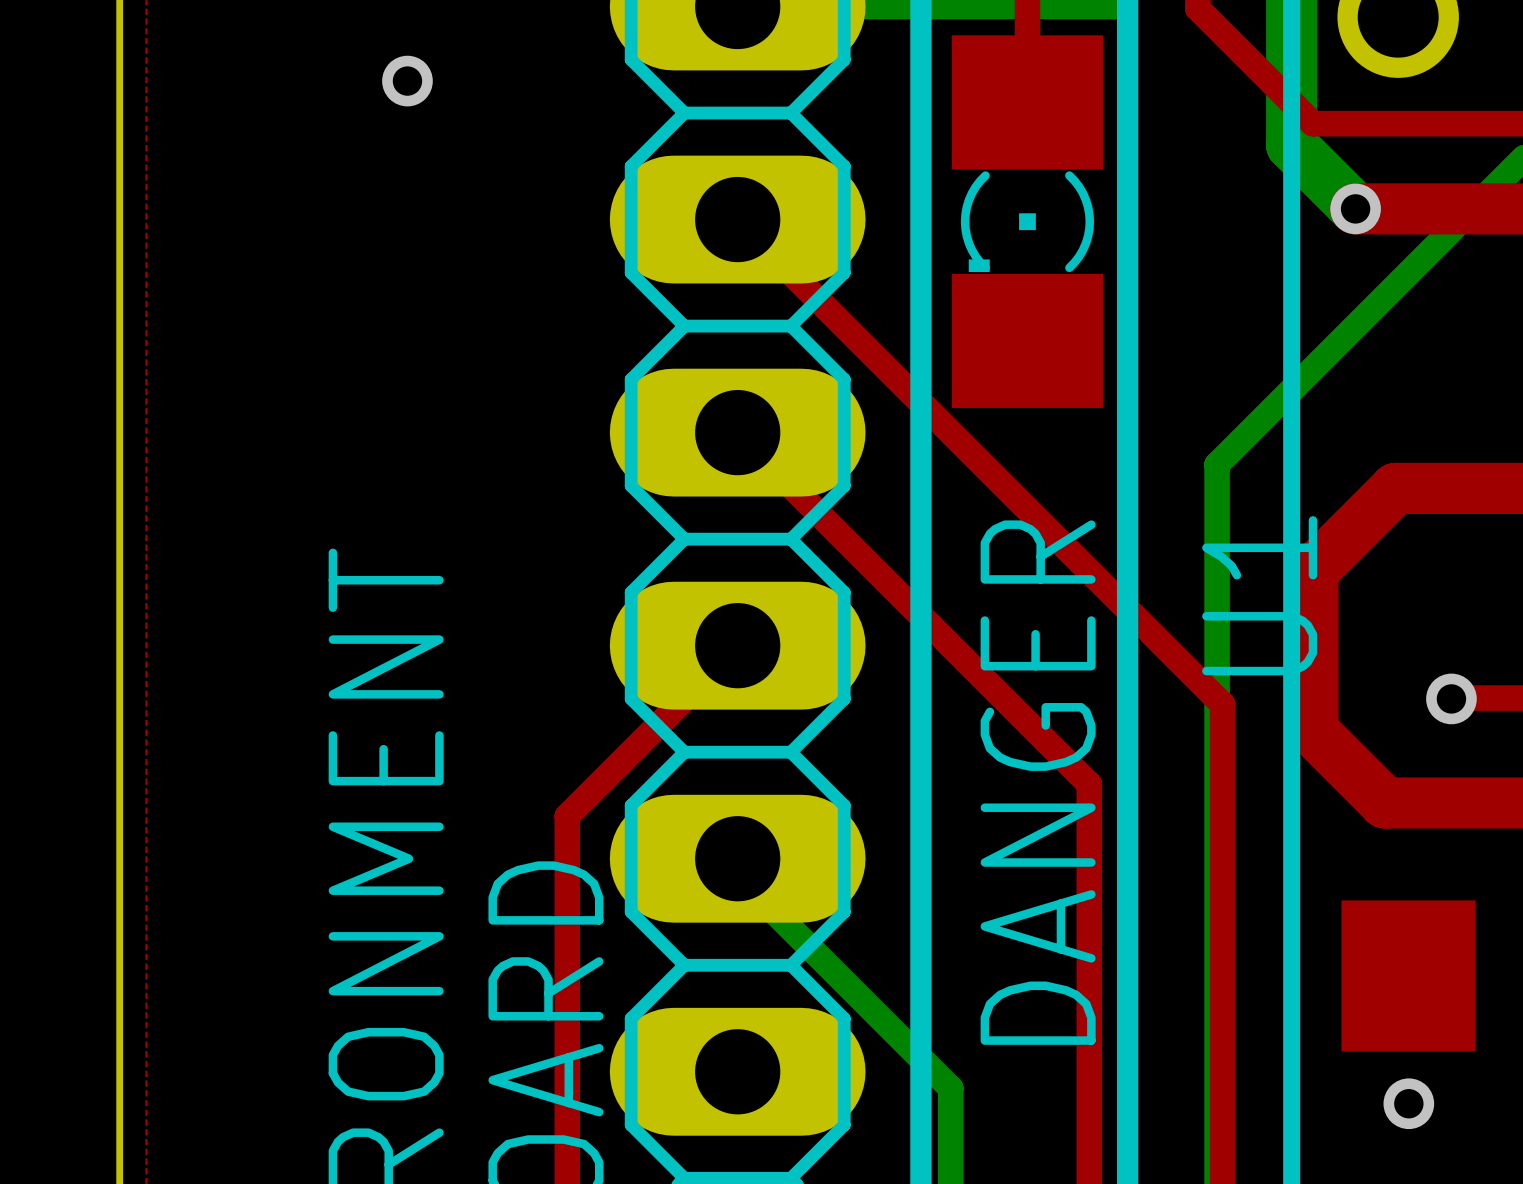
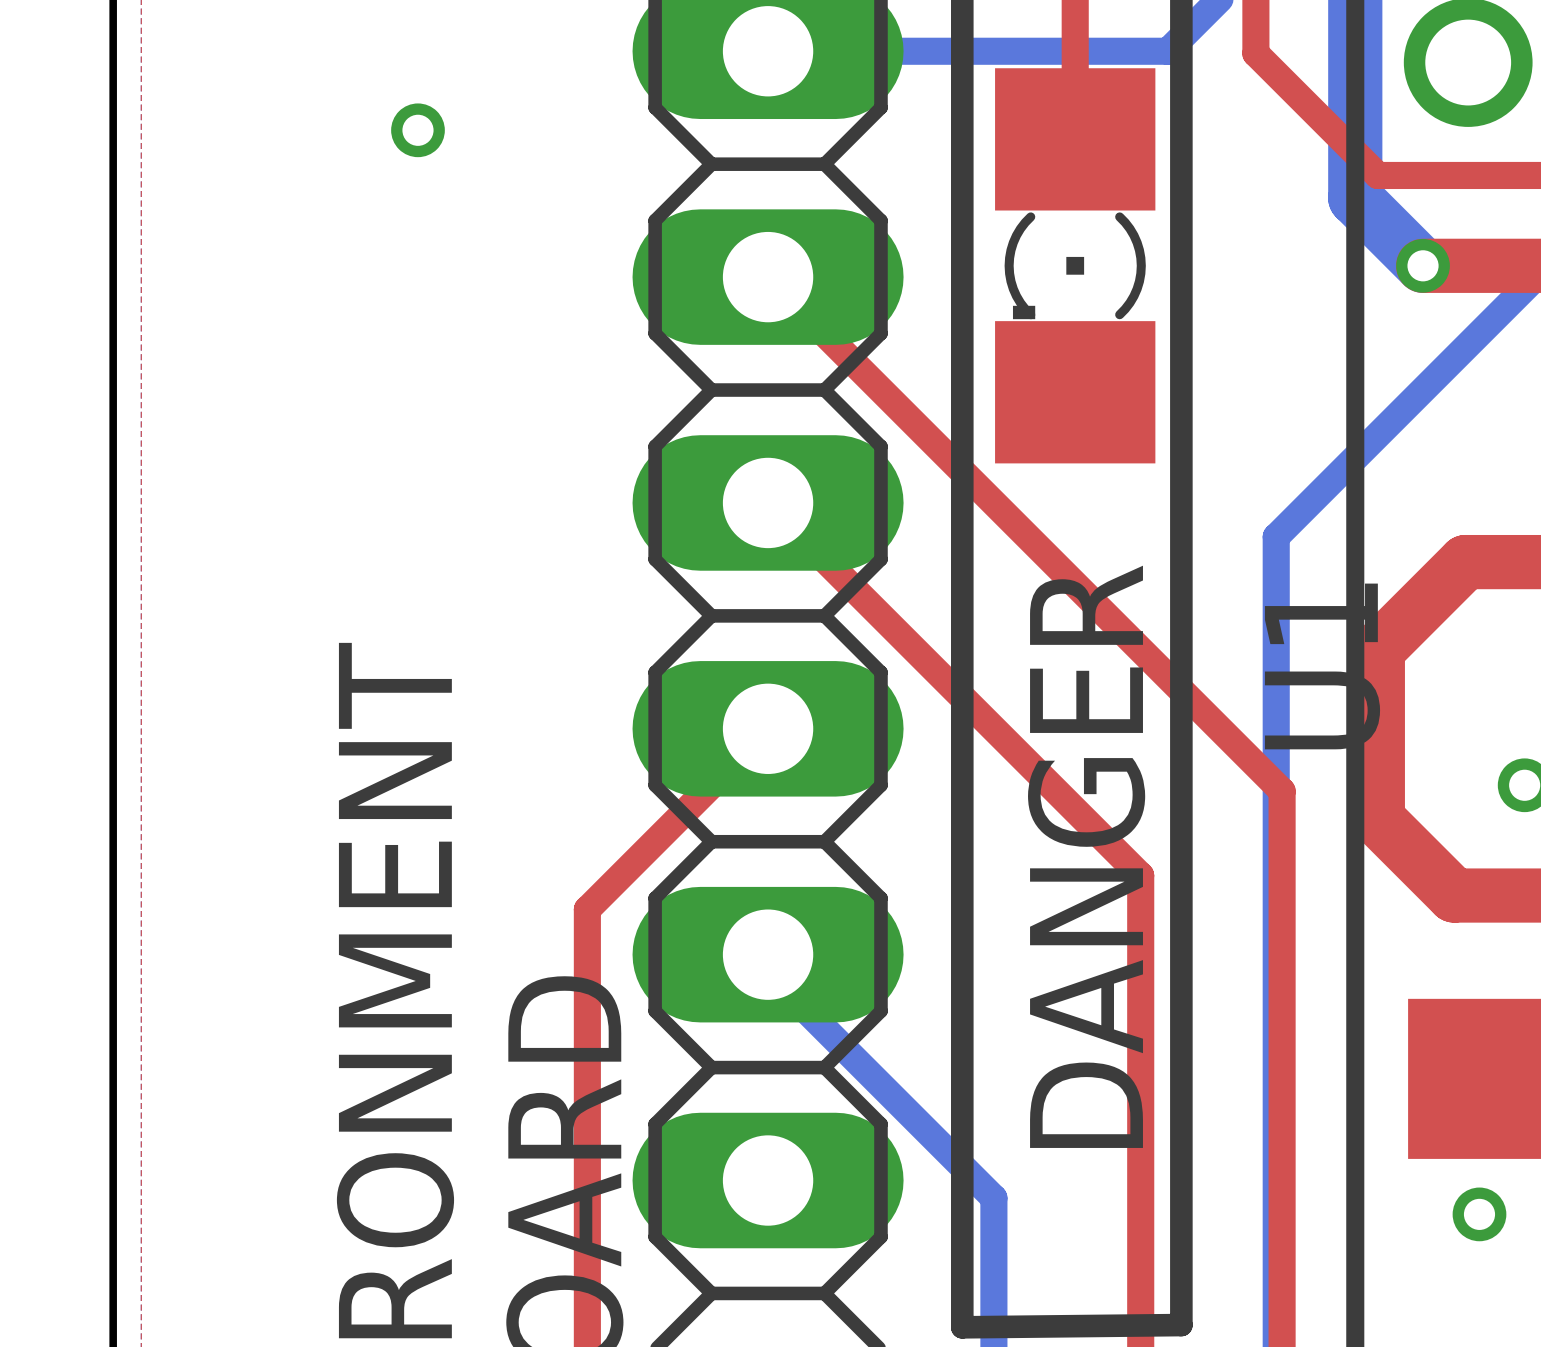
DANGER position: (1027, 221) -> (1075, 265)

